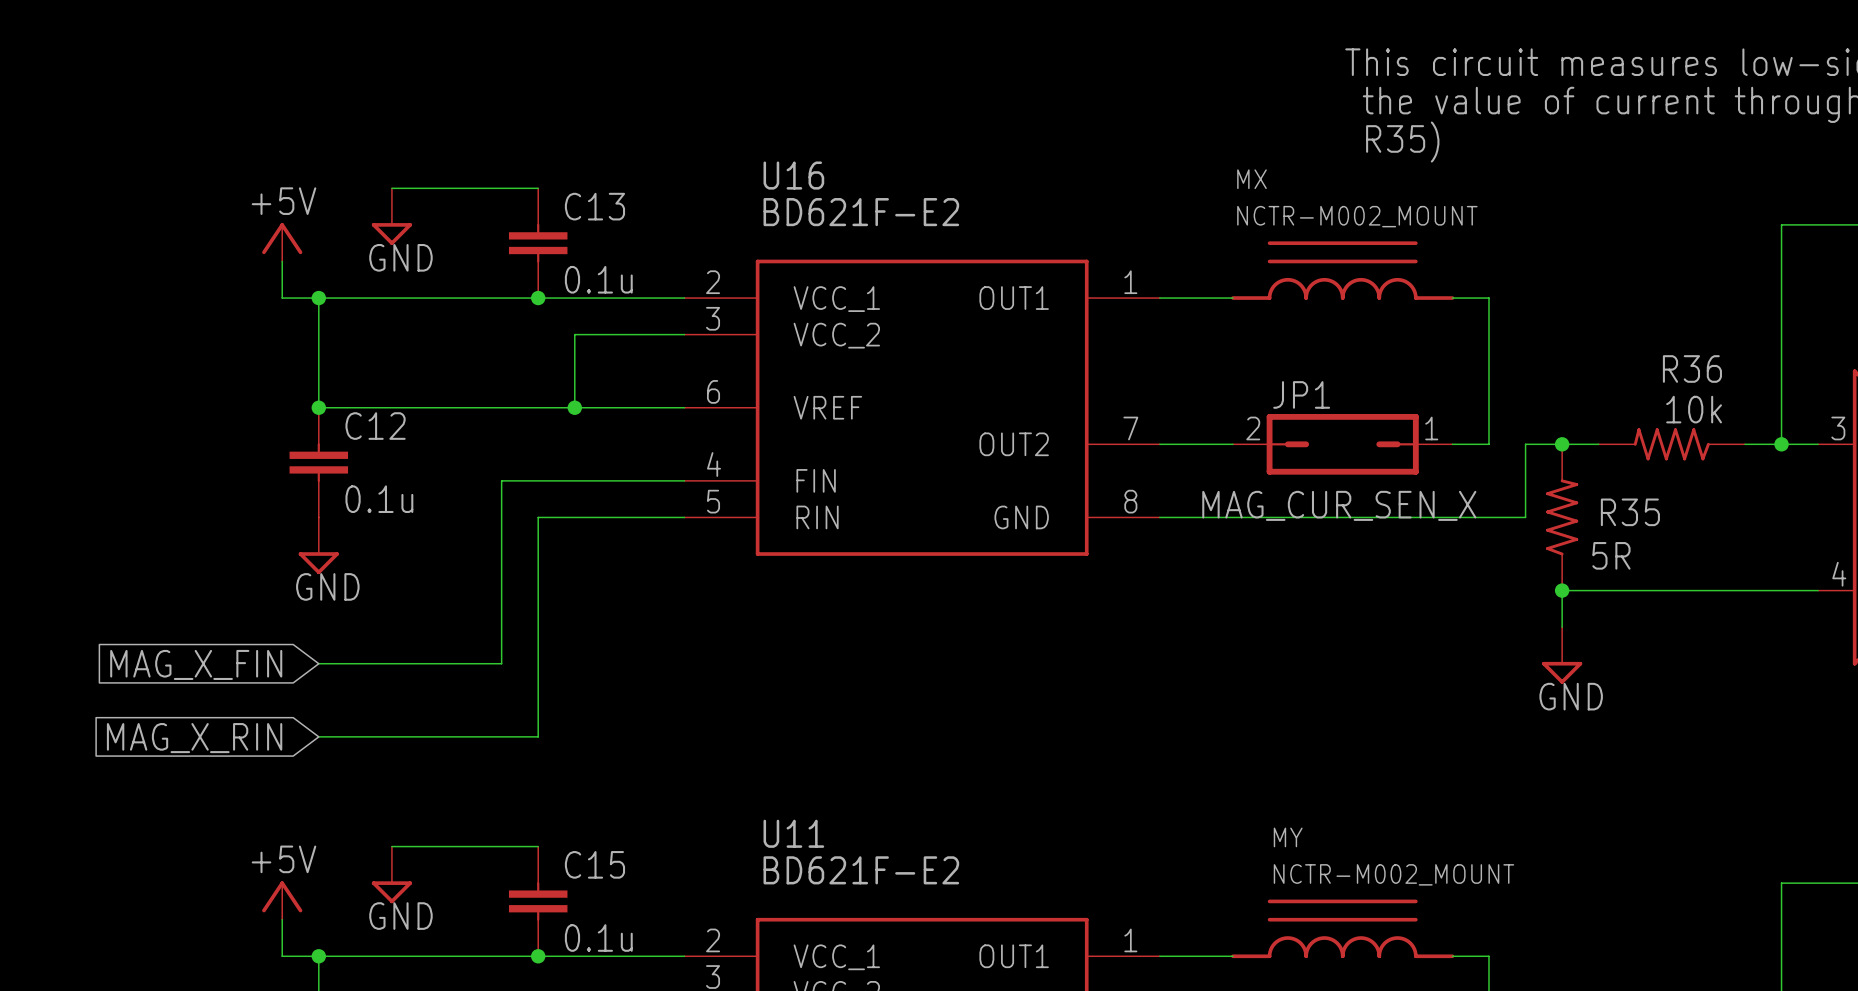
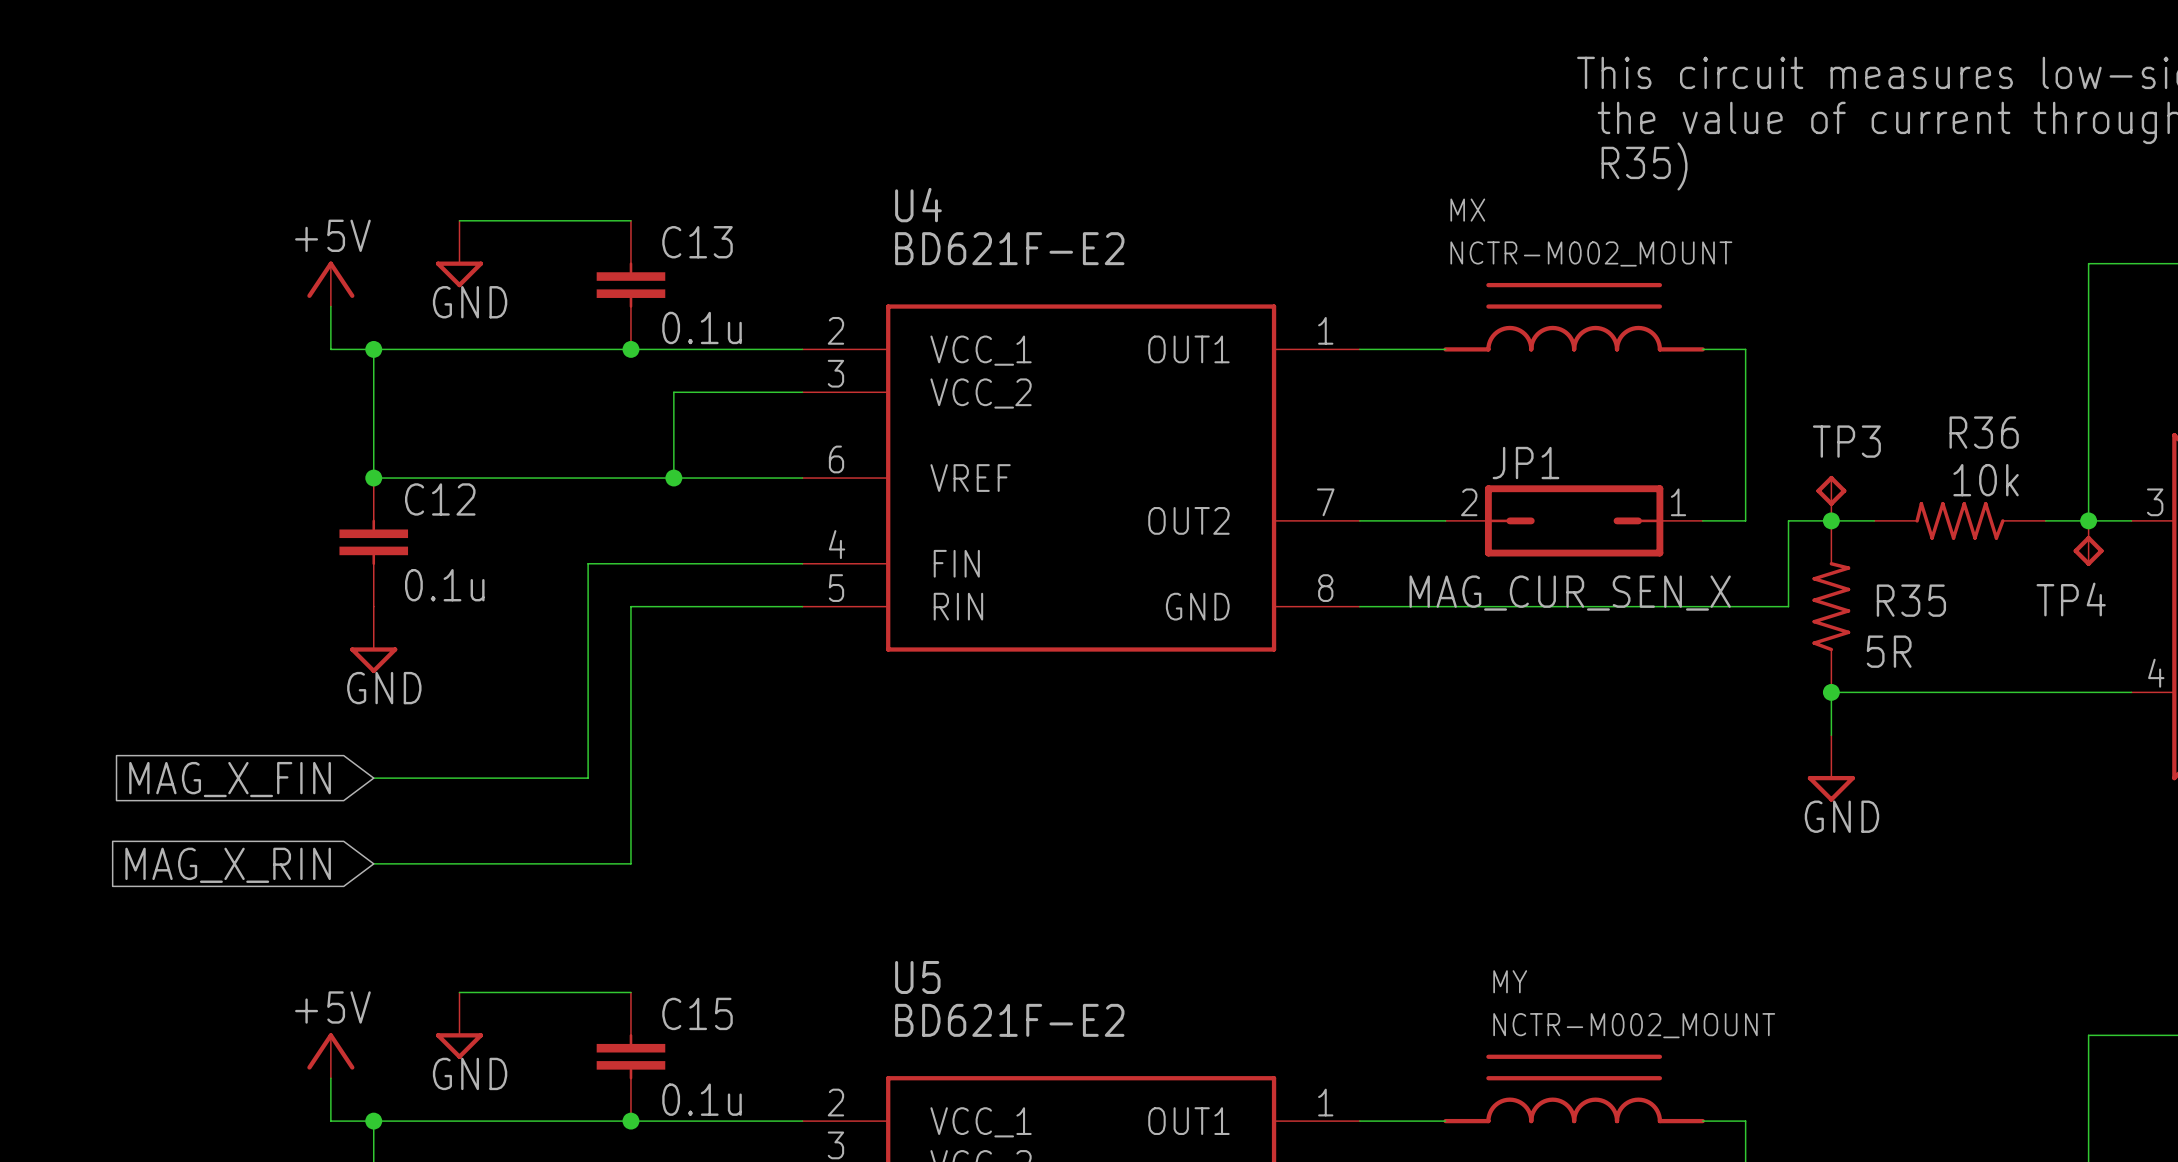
U16 name: U16 (793, 175) -> U4 (918, 205)
TP3: none -> (1831, 498)
TP4: none -> (2088, 543)
U11 name: U11 (793, 833) -> U5 (917, 977)

